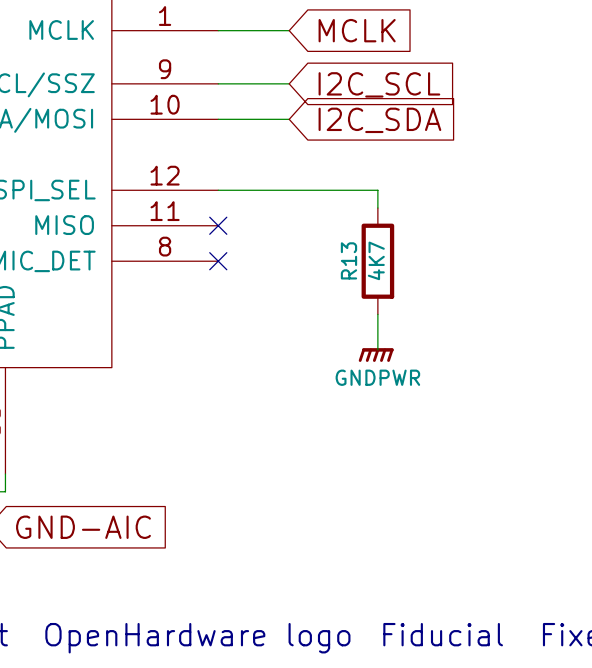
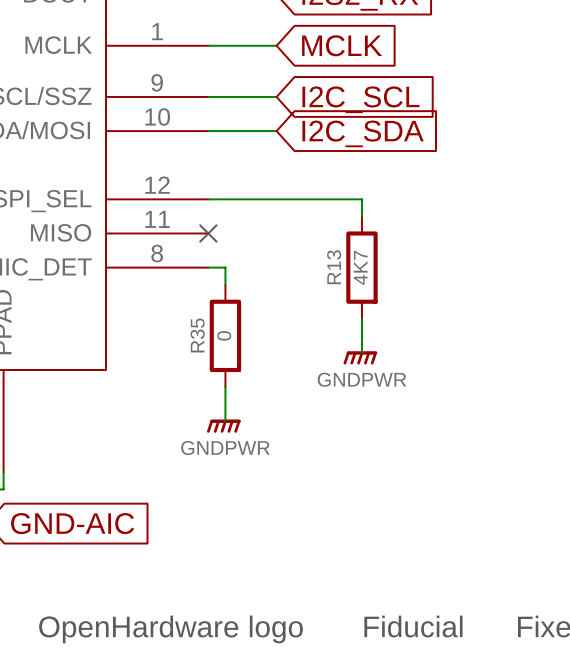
wire: none -> (208, 267) (225, 267) (225, 284)
no-connect mark: (218, 261) -> none
R35: none -> 0 (225, 335)
wire: none -> (225, 387) (225, 421)
power symbol: none -> GNDPWR (223, 426)

